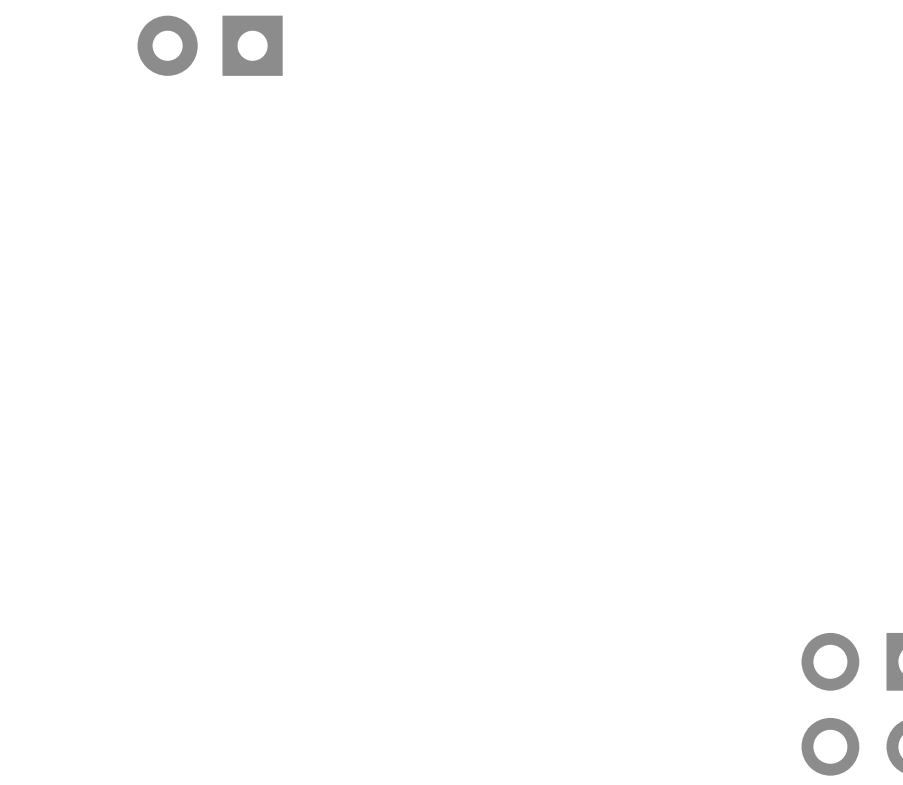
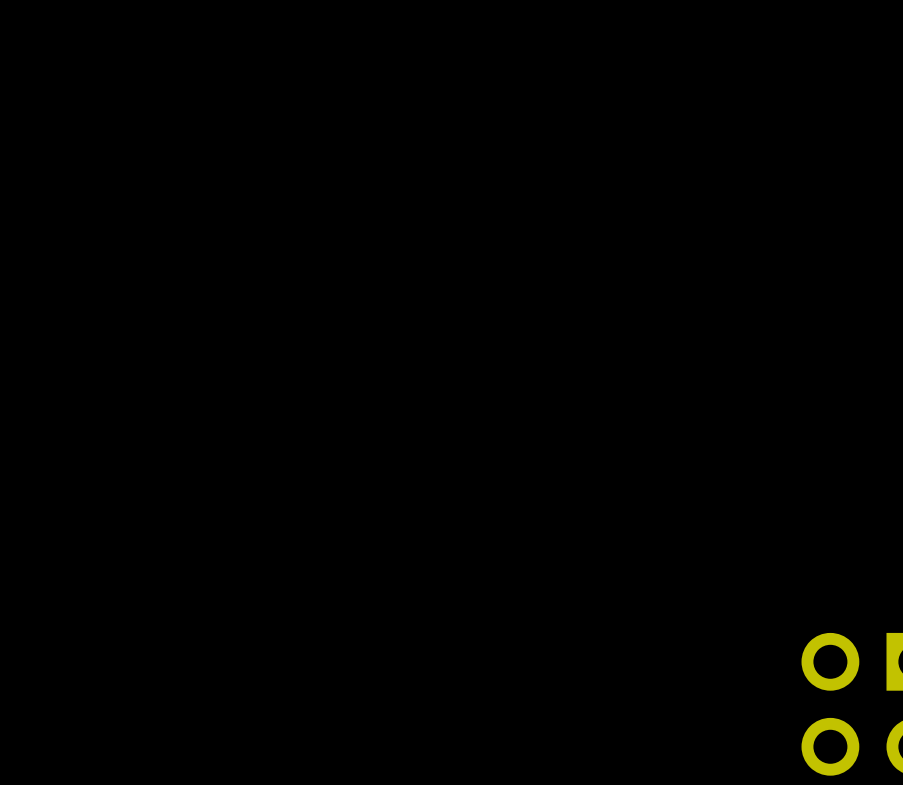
part: (210, 45) -> none

